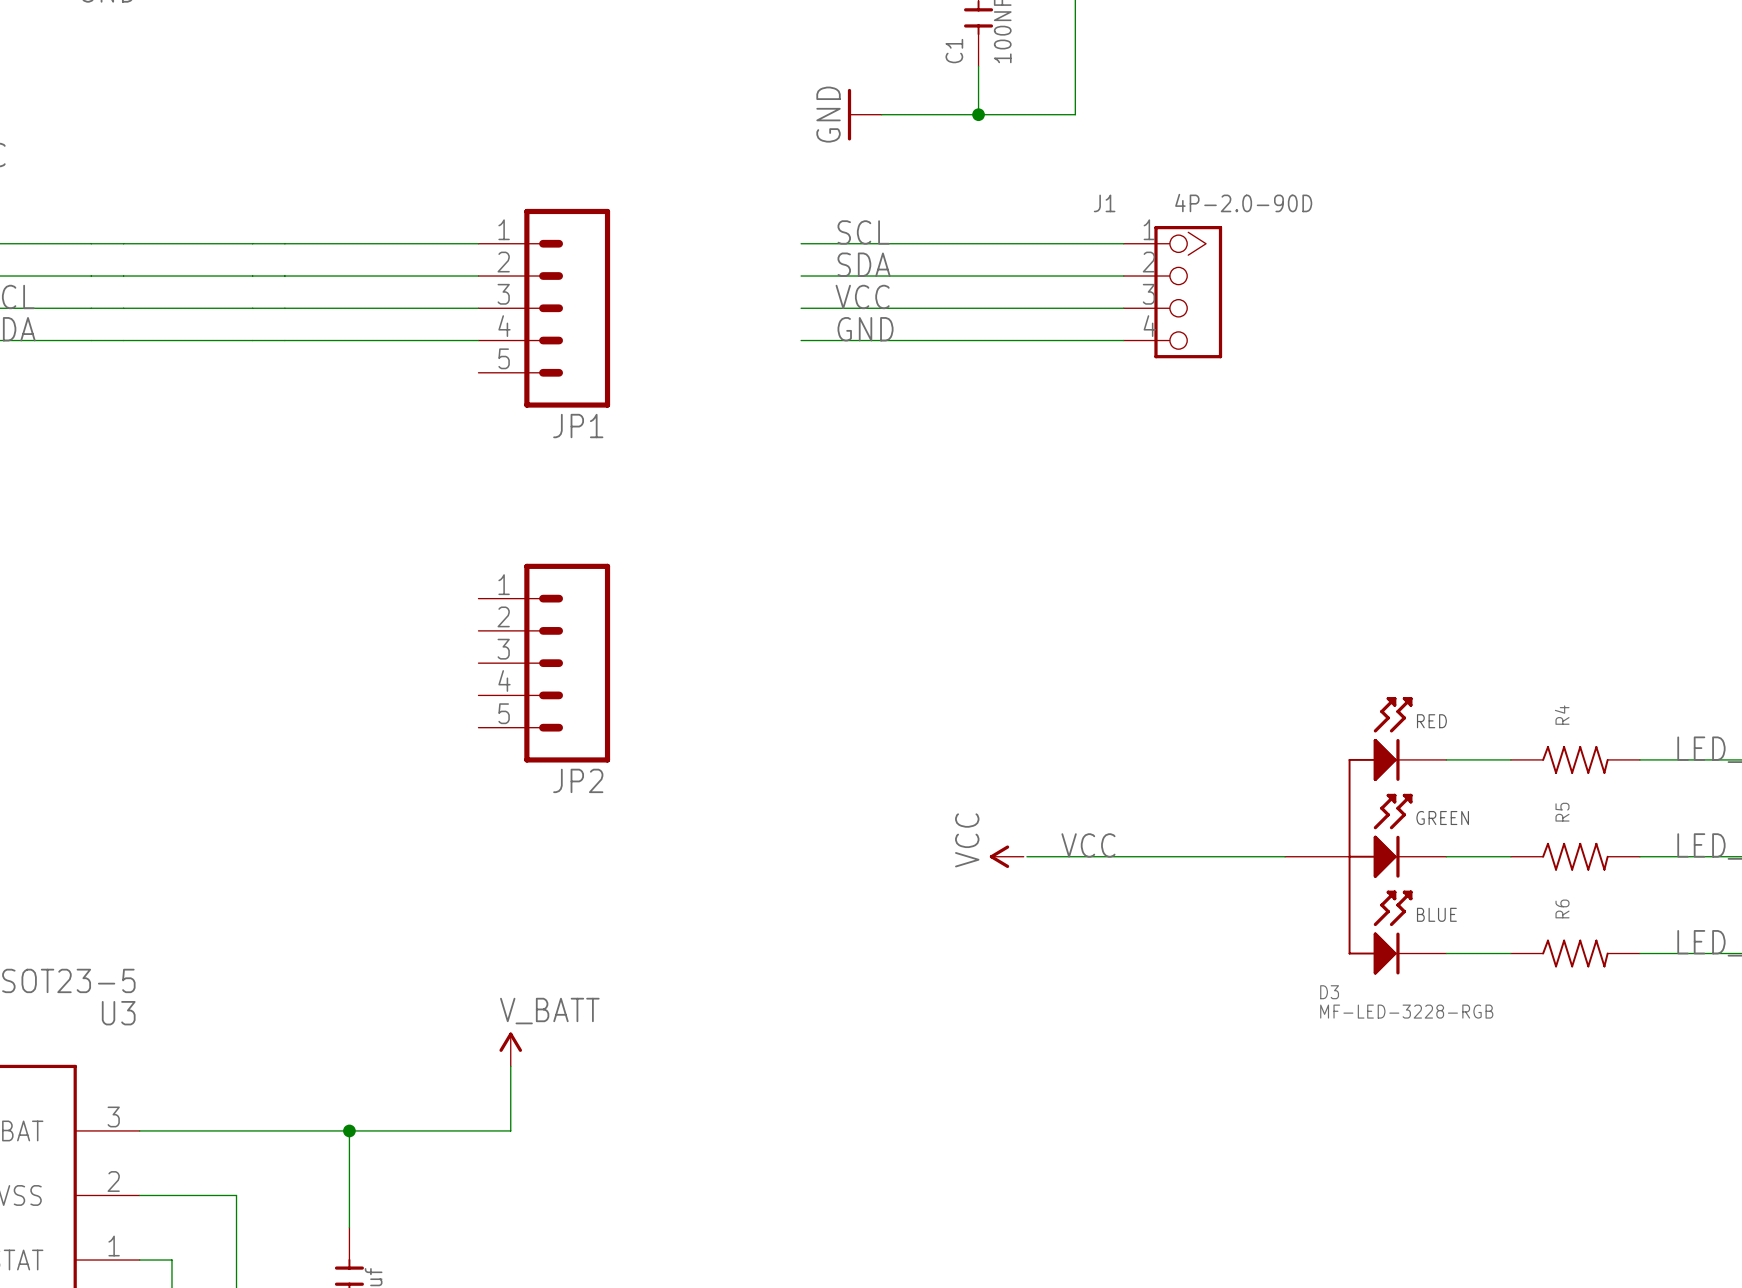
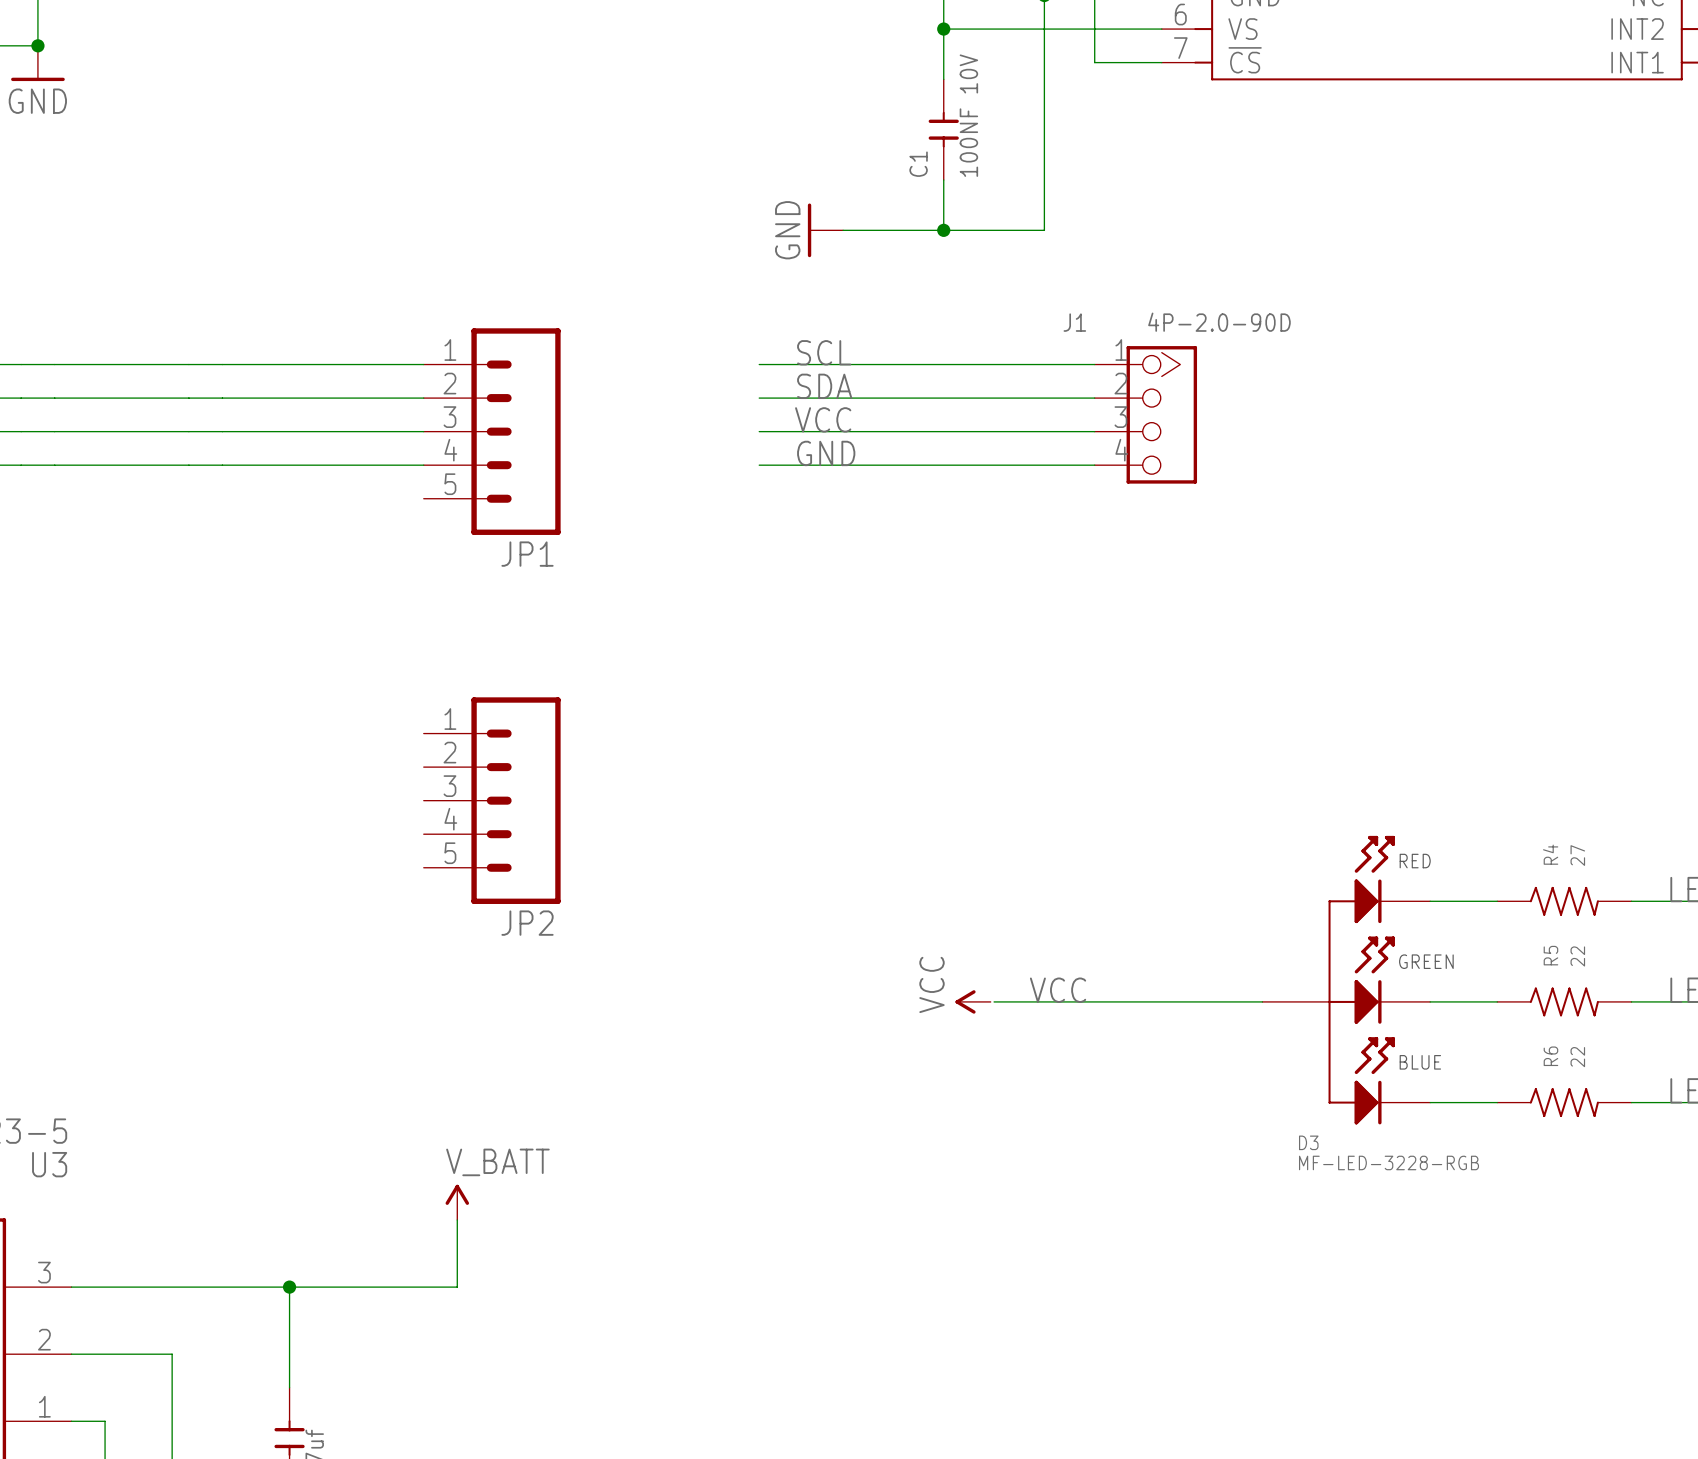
R4 value: none -> 27 (1577, 855)
R5 value: none -> 22 (1577, 956)
R6 value: none -> 22 (1577, 1057)

